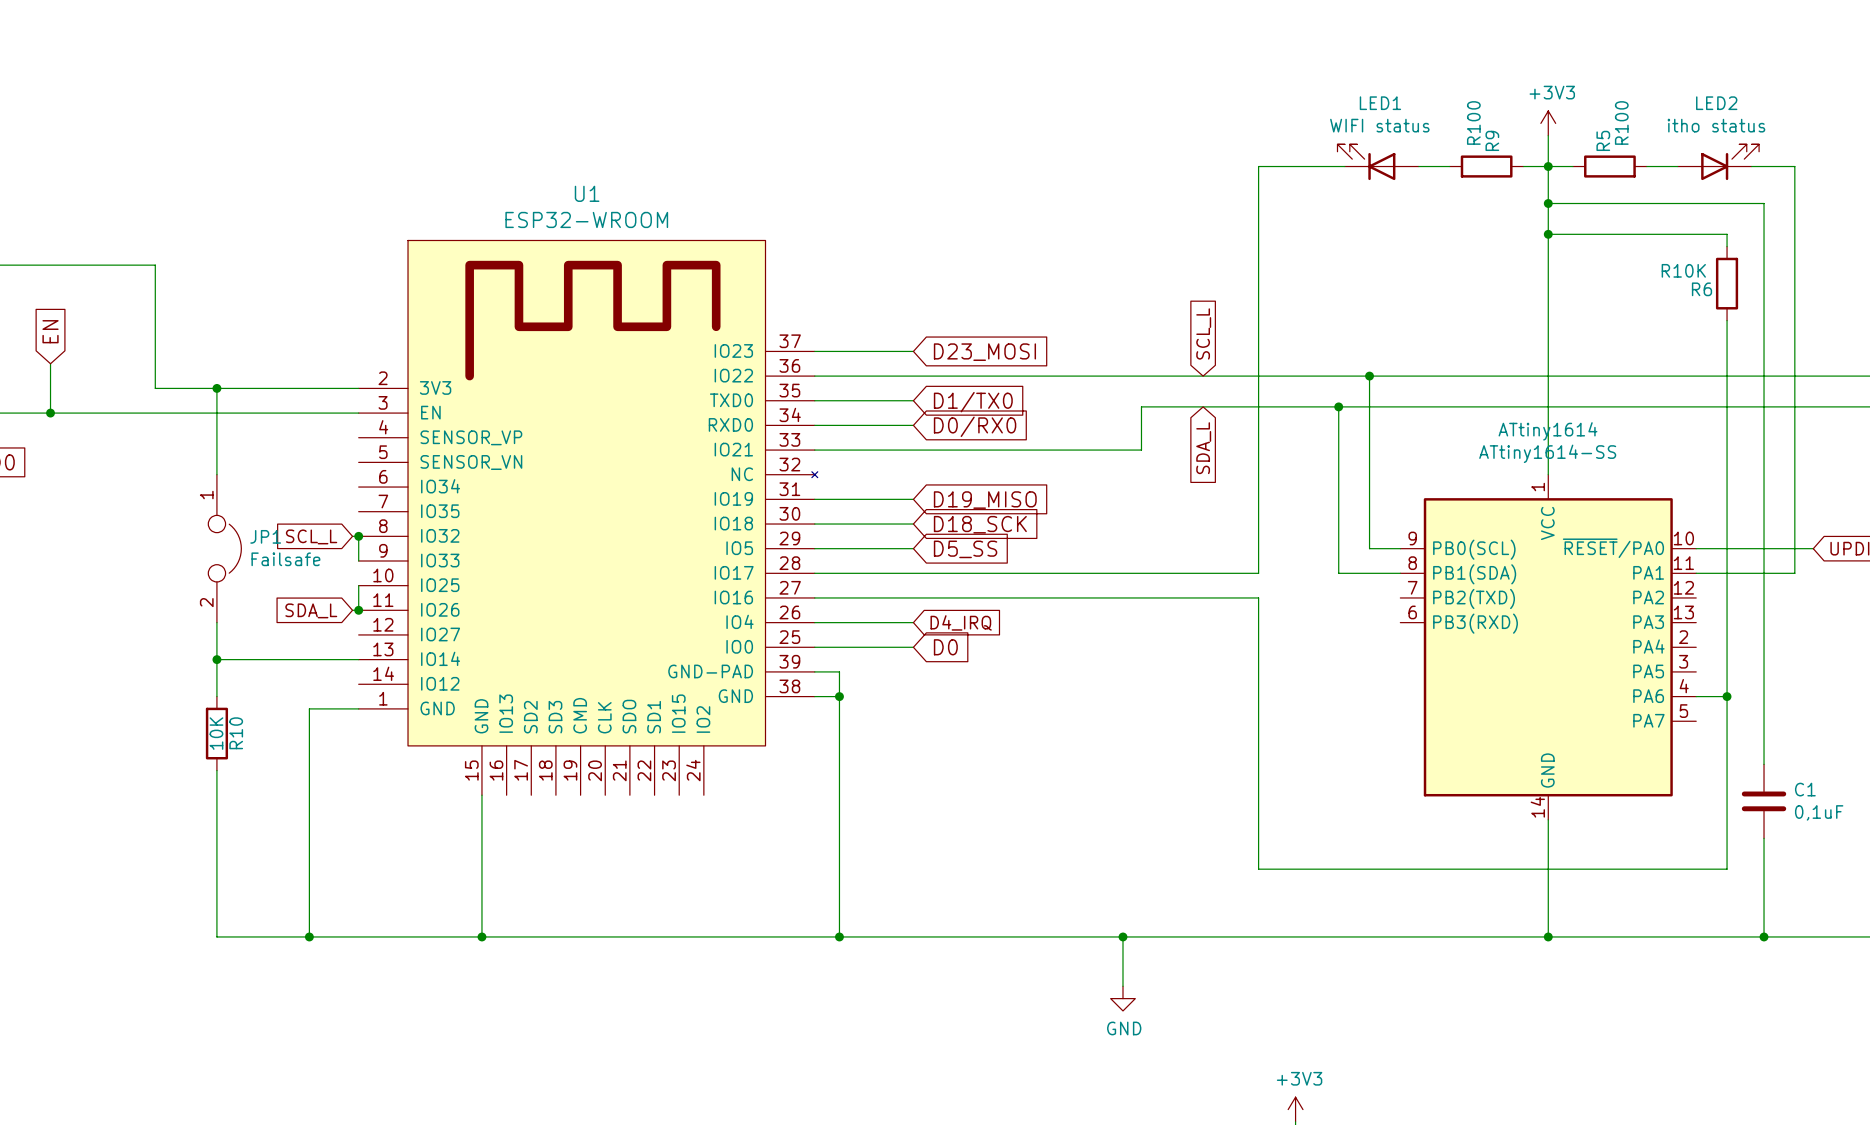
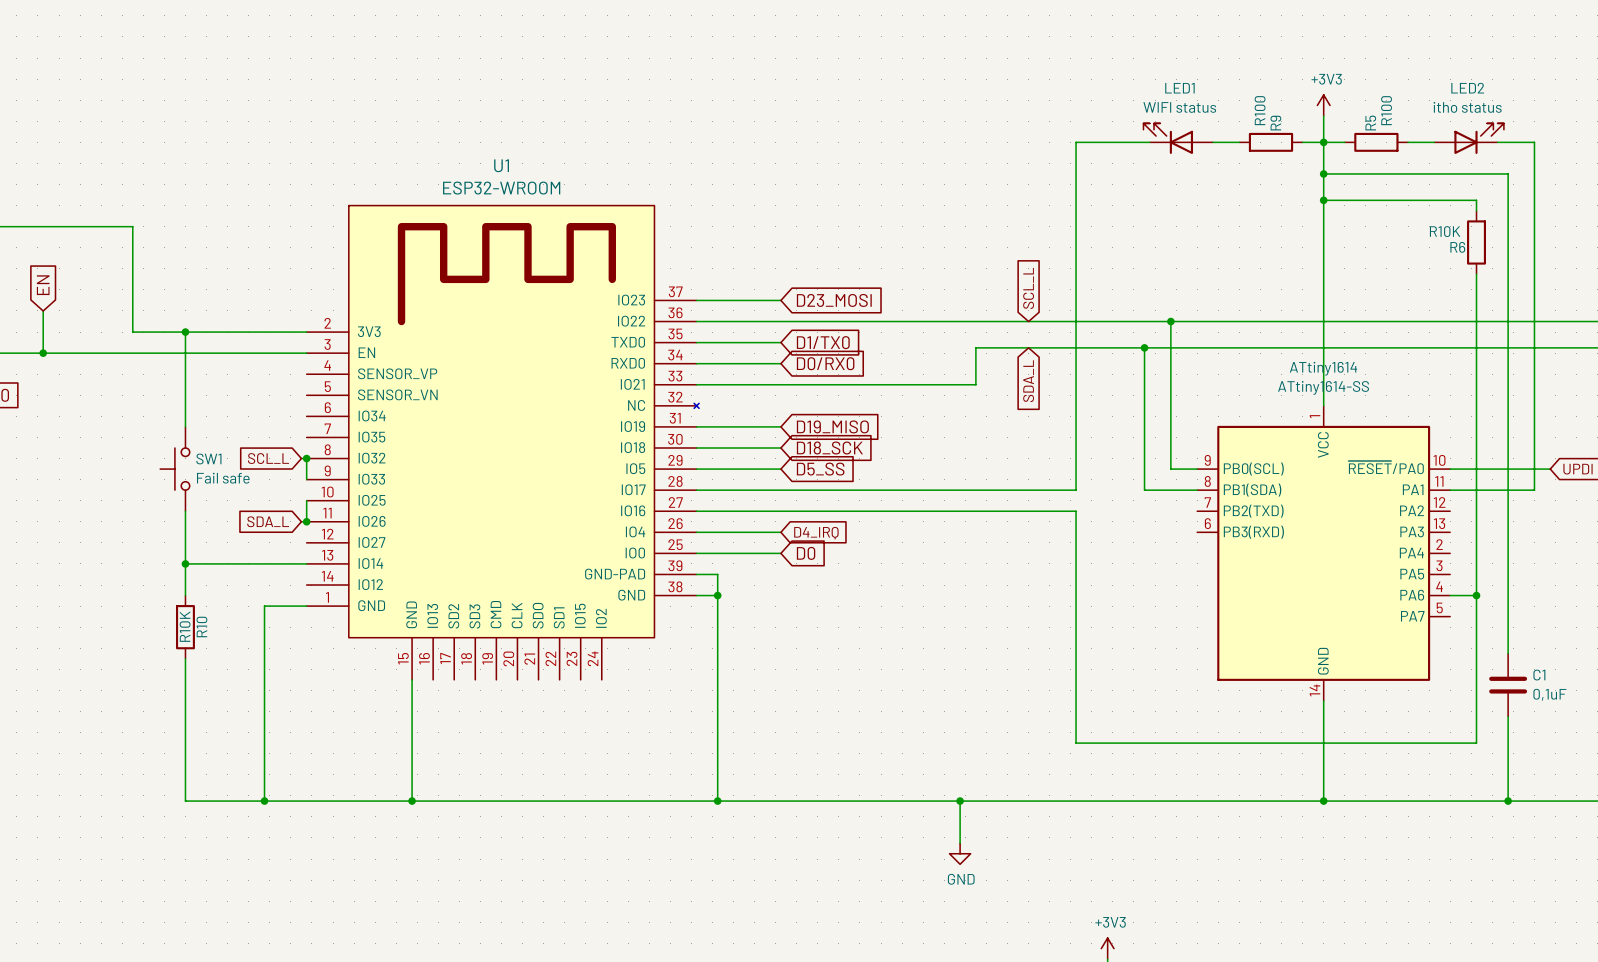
SW1: none -> Fail safe (174, 469)
JP1: Failsafe (224, 548) -> none
R10 value: 10K (216, 733) -> R10K (185, 626)

